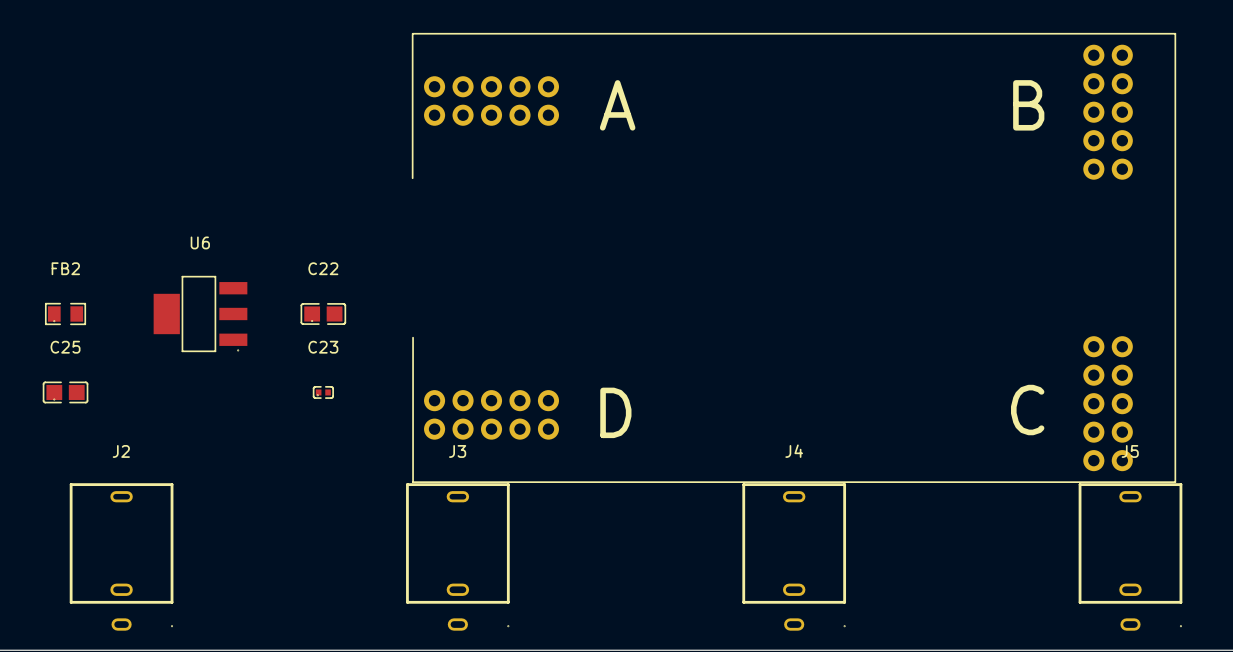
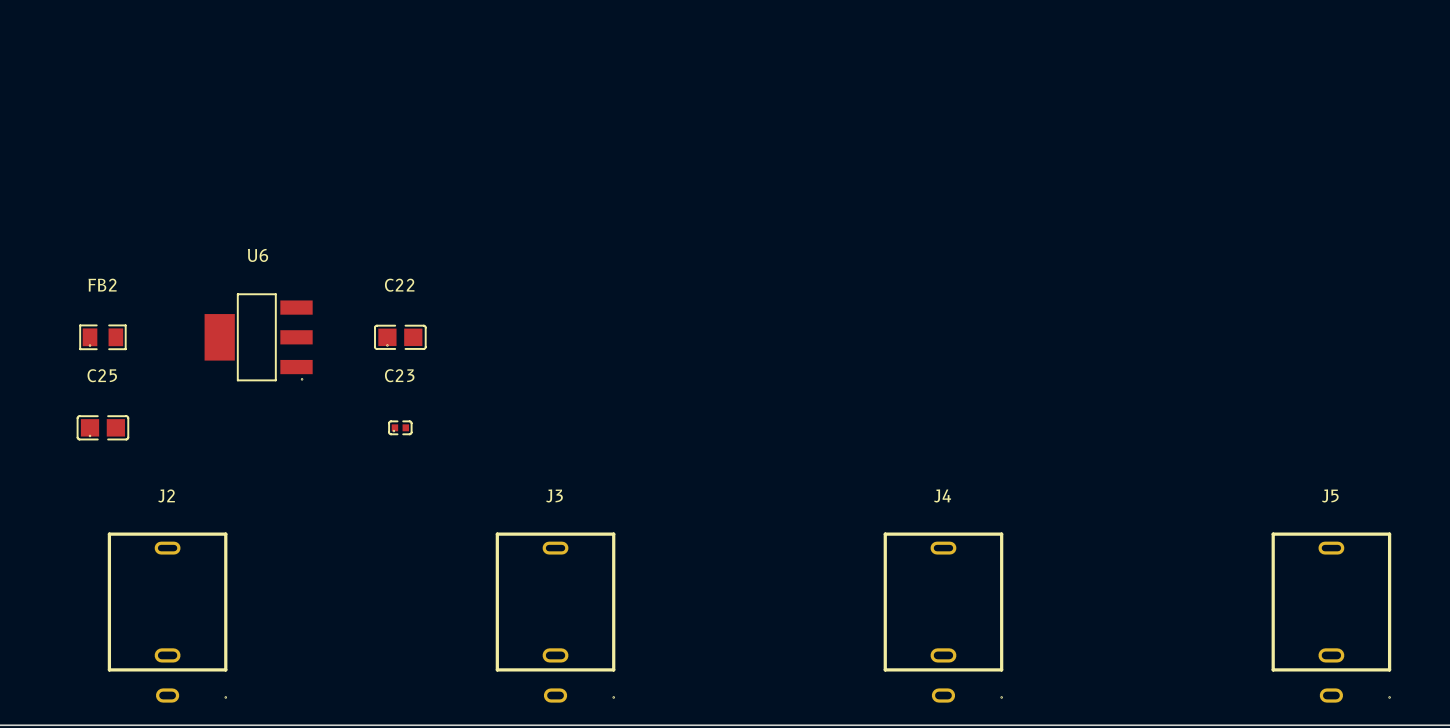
part: (793, 257) -> none

